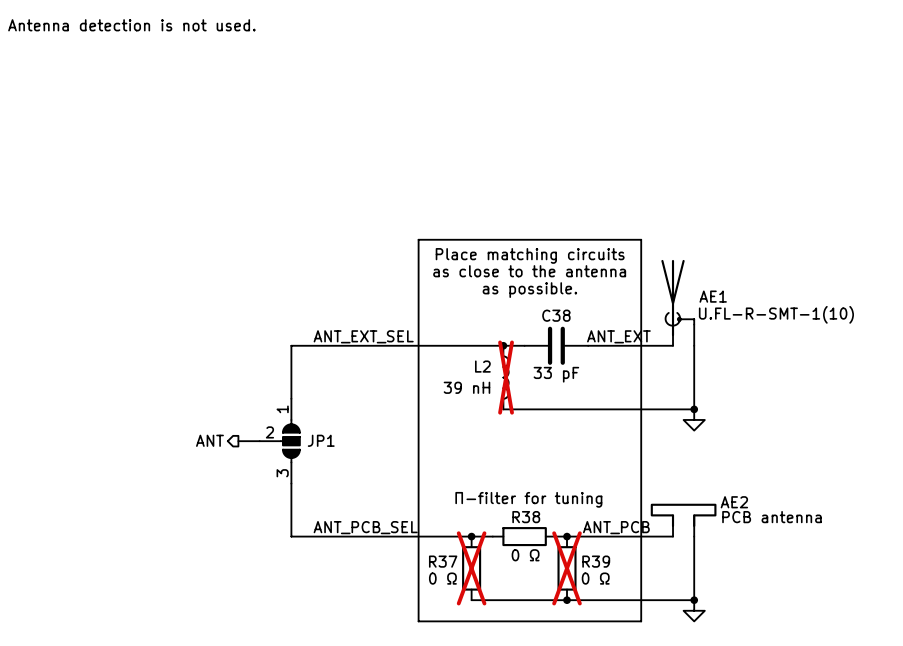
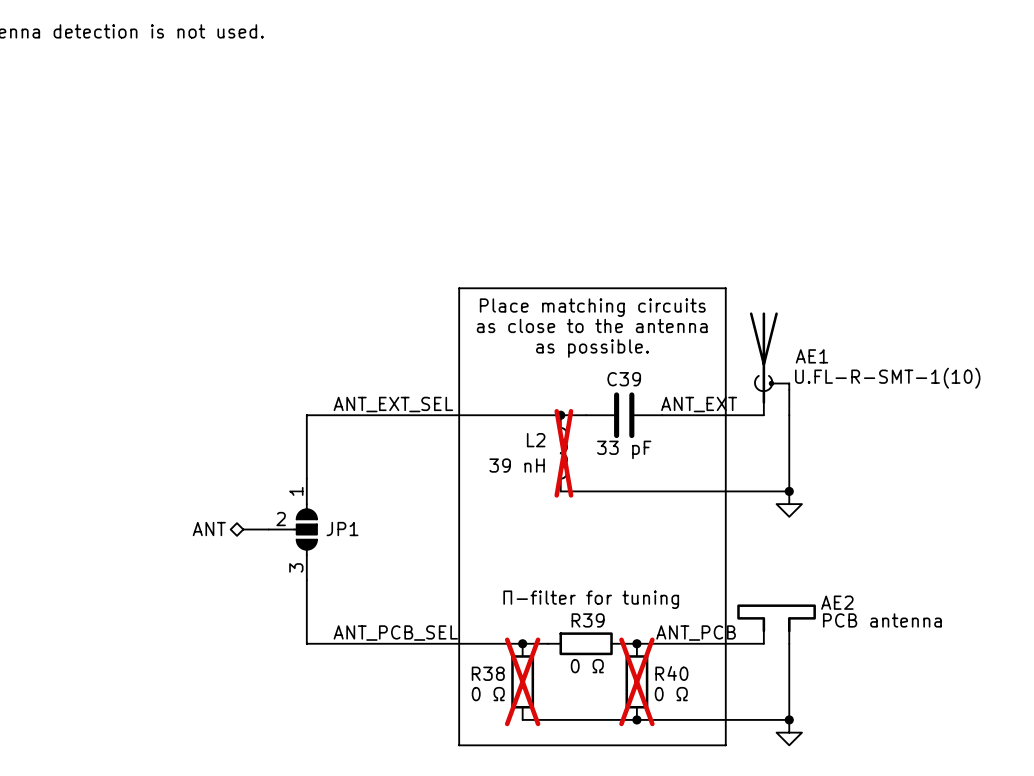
C38 name: C38 (556, 315) -> C39 (624, 379)
hierarchical label shape: output (209, 440) -> bidirectional (209, 529)
R38 name: R38 (526, 517) -> R39 (588, 620)
R37 name: R37 (443, 561) -> R38 (488, 673)
R39 name: R39 (596, 561) -> R40 (671, 673)

